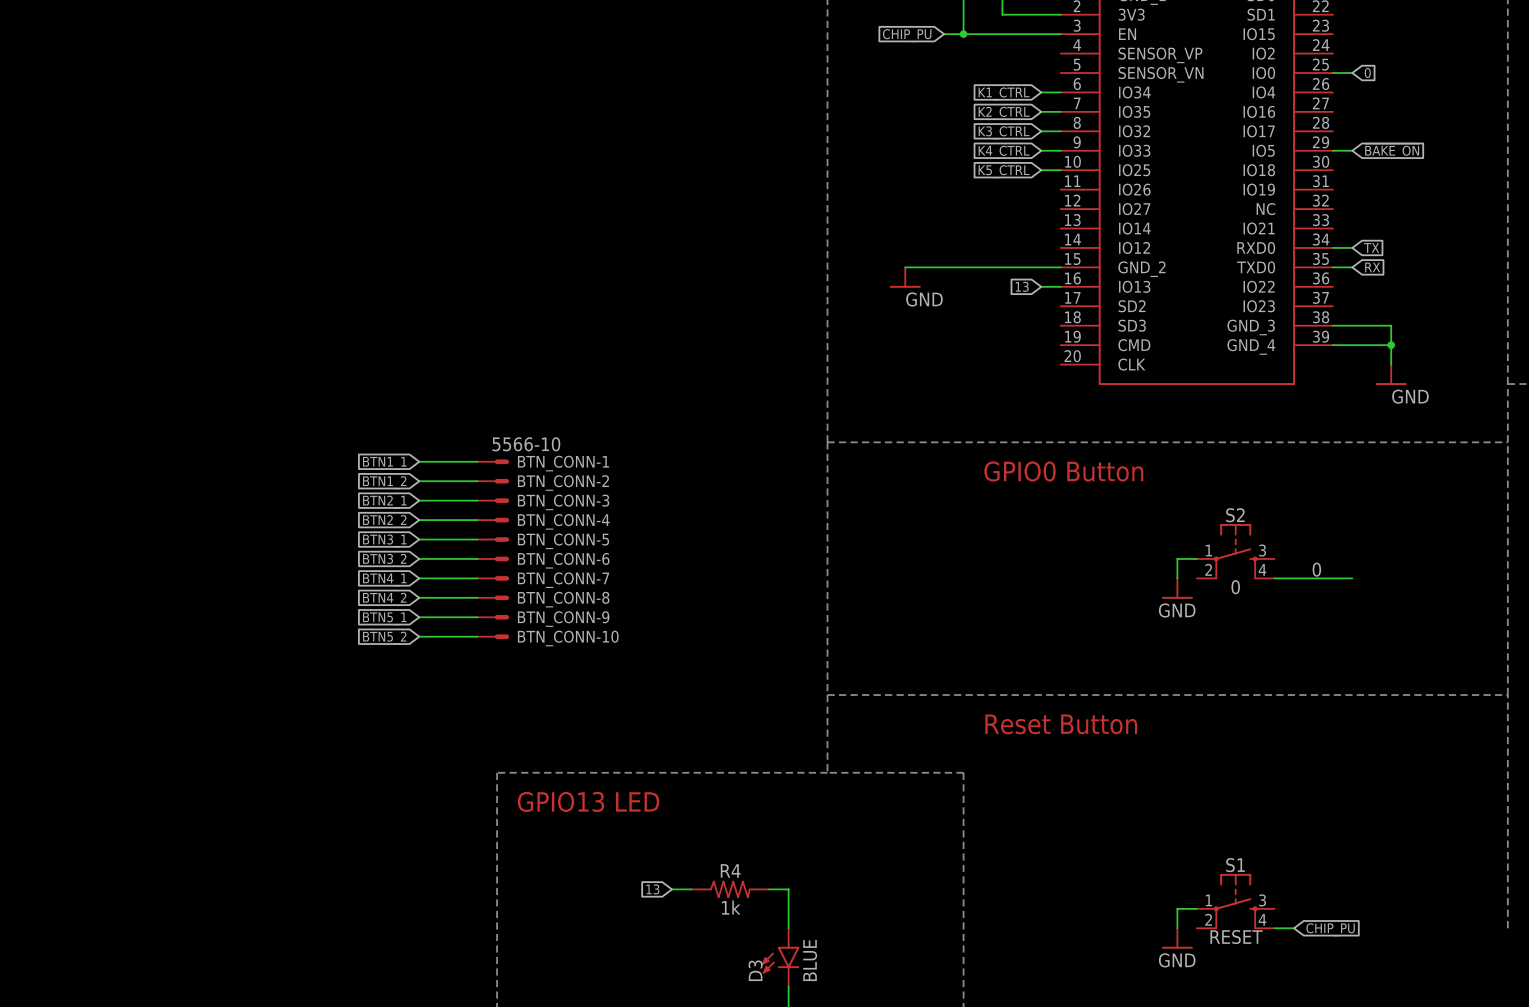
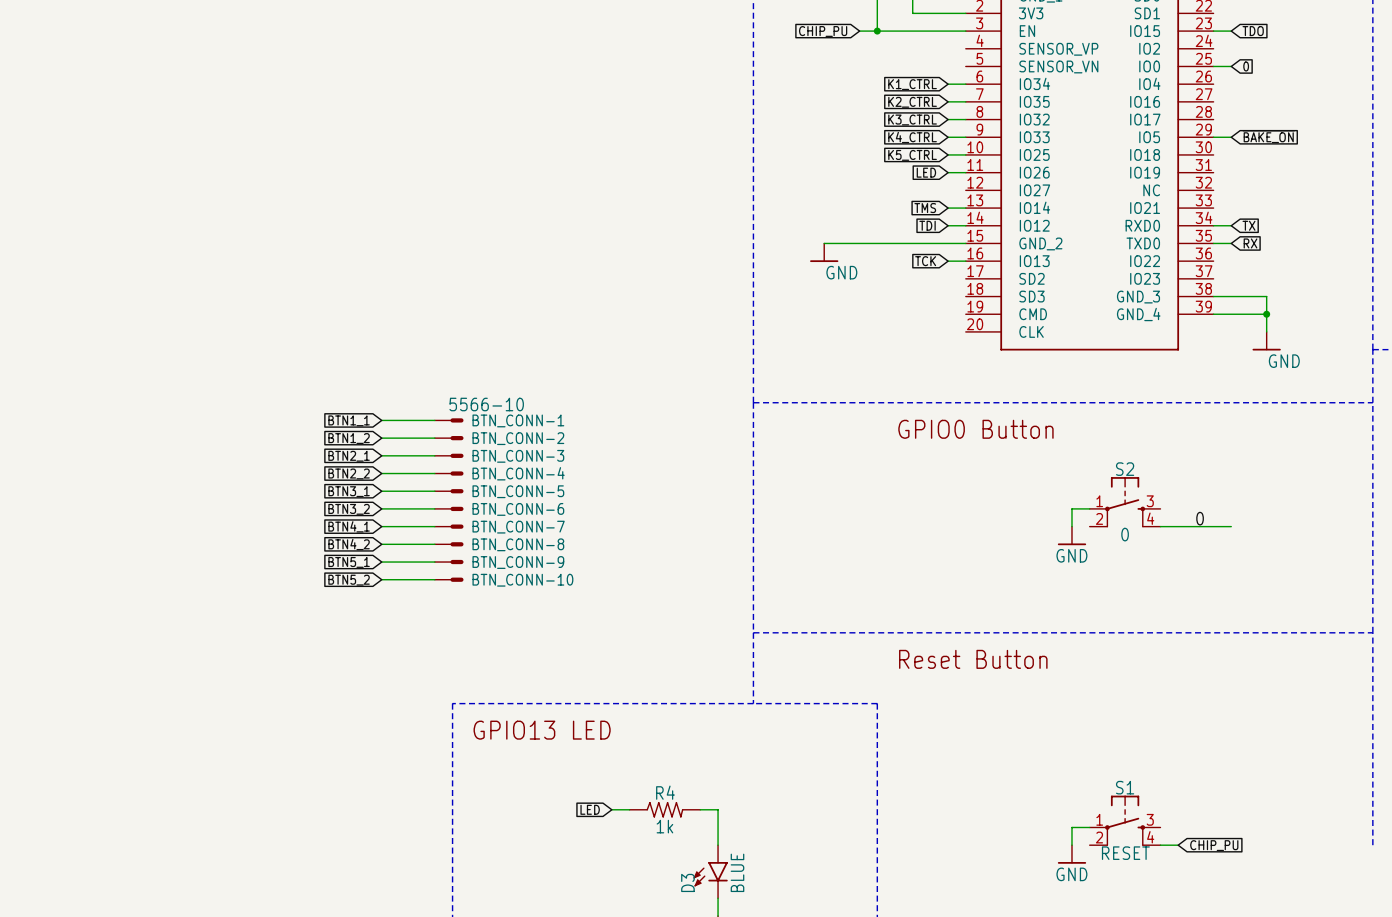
wire: none -> (1213, 31) (1231, 31)
global label: none -> TDO (1253, 31)
global label: none -> LED (926, 172)
wire: none -> (948, 172) (965, 172)
global label: none -> TMS (925, 208)
wire: none -> (948, 208) (965, 208)
global label: none -> TDI (927, 225)
wire: none -> (948, 225) (965, 225)
global label: 13 (1022, 286) -> TCK (925, 261)
global label: 13 (652, 889) -> LED (590, 809)

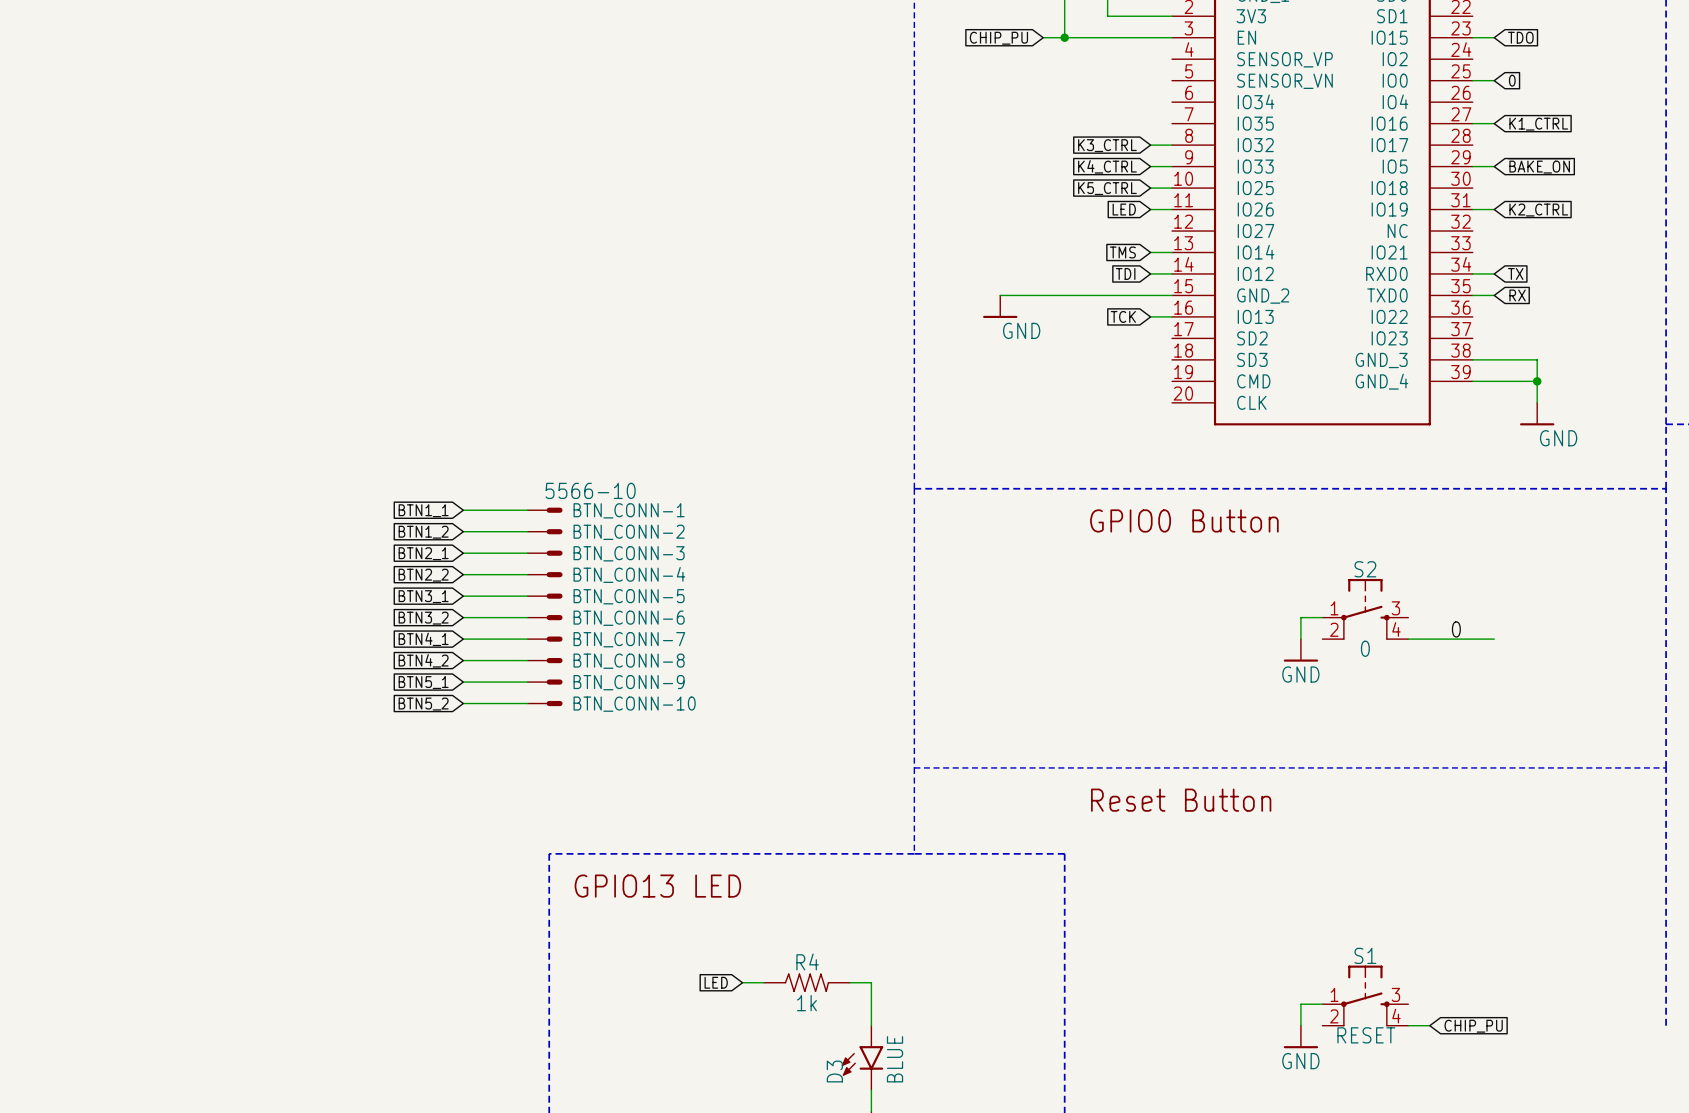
global label: K1_CTRL (912, 84) -> none
wire: (948, 84) (965, 84) -> none
wire: (948, 101) (965, 101) -> none
wire: none -> (1472, 123) (1494, 123)
global label: K2_CTRL (912, 102) -> none
global label: none -> K1_CTRL (1538, 124)
wire: none -> (1472, 209) (1494, 209)
global label: none -> K2_CTRL (1538, 210)

